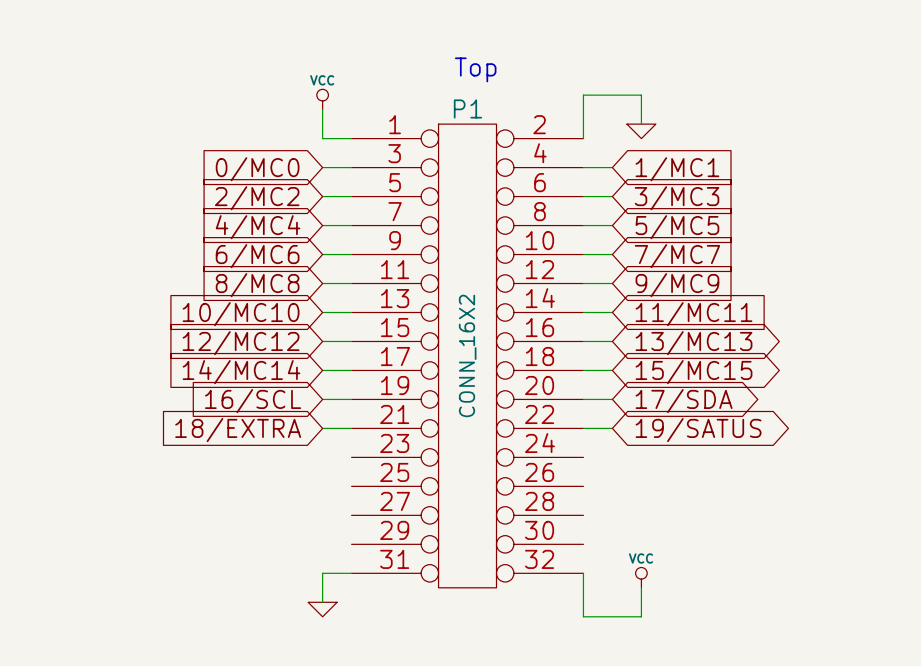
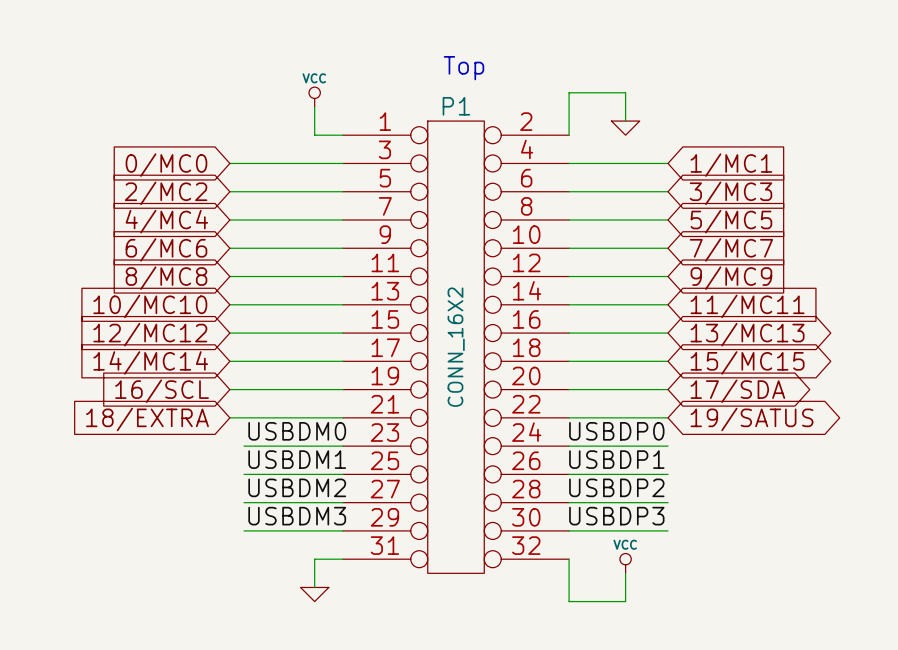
wire: none -> (229, 163) (314, 163)
wire: none -> (597, 163) (668, 163)
global label position: 0/MC0 (257, 169) -> 0/MC0 (166, 165)
global label position: 1/MC1 (677, 169) -> 1/MC1 (731, 165)
wire: none -> (229, 191) (314, 191)
wire: none -> (597, 191) (668, 191)
global label position: 2/MC2 (257, 198) -> 2/MC2 (166, 193)
global label position: 3/MC3 (677, 198) -> 3/MC3 (731, 193)
wire: none -> (229, 219) (314, 219)
wire: none -> (597, 219) (668, 219)
global label position: 4/MC4 (258, 227) -> 4/MC4 (166, 221)
global label position: 5/MC5 (677, 227) -> 5/MC5 (731, 221)
wire: none -> (229, 248) (314, 248)
wire: none -> (597, 248) (668, 248)
global label position: 6/MC6 (257, 256) -> 6/MC6 (166, 249)
global label position: 7/MC7 (677, 256) -> 7/MC7 (731, 249)
wire: none -> (229, 276) (314, 276)
wire: none -> (597, 276) (668, 276)
global label position: 8/MC8 (257, 285) -> 8/MC8 (166, 278)
global label position: 9/MC9 (677, 285) -> 9/MC9 (731, 278)
wire: none -> (229, 304) (314, 304)
wire: none -> (597, 304) (668, 304)
global label position: 10/MC10 (241, 314) -> 10/MC10 (150, 306)
global label position: 11/MC11 (693, 314) -> 11/MC11 (747, 306)
wire: none -> (229, 333) (314, 333)
wire: none -> (597, 333) (668, 333)
global label position: 12/MC12 (241, 343) -> 12/MC12 (150, 334)
global label position: 13/MC13 (693, 343) -> 13/MC13 (747, 334)
wire: none -> (229, 361) (314, 361)
wire: none -> (597, 361) (668, 361)
global label position: 14/MC14 (241, 372) -> 14/MC14 (150, 362)
global label position: 15/MC15 (693, 372) -> 15/MC15 (747, 362)
wire: none -> (229, 389) (314, 389)
wire: none -> (597, 389) (668, 389)
global label position: 16/SCL (253, 401) -> 16/SCL (162, 391)
global label position: 17/SDA (684, 401) -> 17/SDA (737, 391)
wire: none -> (229, 417) (314, 417)
wire: none -> (597, 417) (668, 417)
global label position: 18/EXTRA (238, 430) -> 18/EXTRA (147, 419)
global label position: 19/SATUS (698, 430) -> 19/SATUS (752, 419)
label: none -> USBDM0 (297, 431)
label: none -> USBDP0 (616, 431)
wire: none -> (244, 446) (342, 446)
wire: none -> (569, 446) (668, 446)
label: none -> USBDM1 (297, 459)
label: none -> USBDP1 (616, 459)
wire: none -> (244, 474) (342, 474)
wire: none -> (569, 474) (668, 474)
label: none -> USBDM2 (297, 487)
label: none -> USBDP2 (616, 487)
wire: none -> (244, 502) (342, 502)
wire: none -> (569, 502) (668, 502)
label: none -> USBDM3 (297, 516)
label: none -> USBDP3 (616, 516)
wire: none -> (244, 530) (342, 530)
wire: none -> (569, 530) (668, 530)

